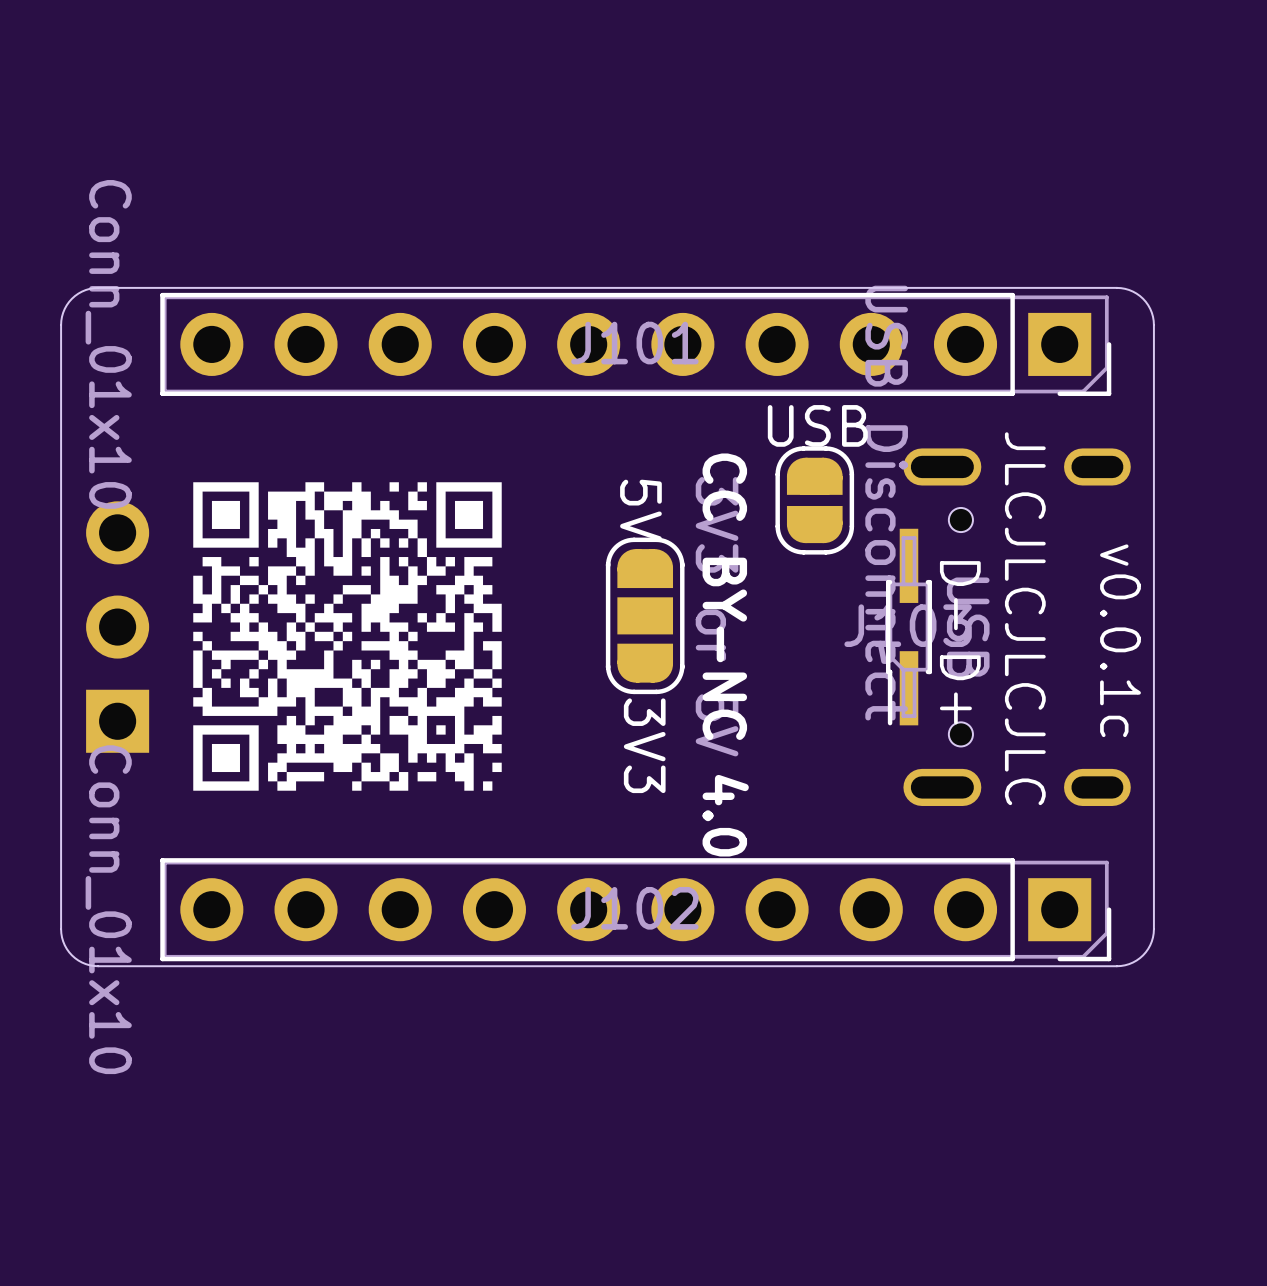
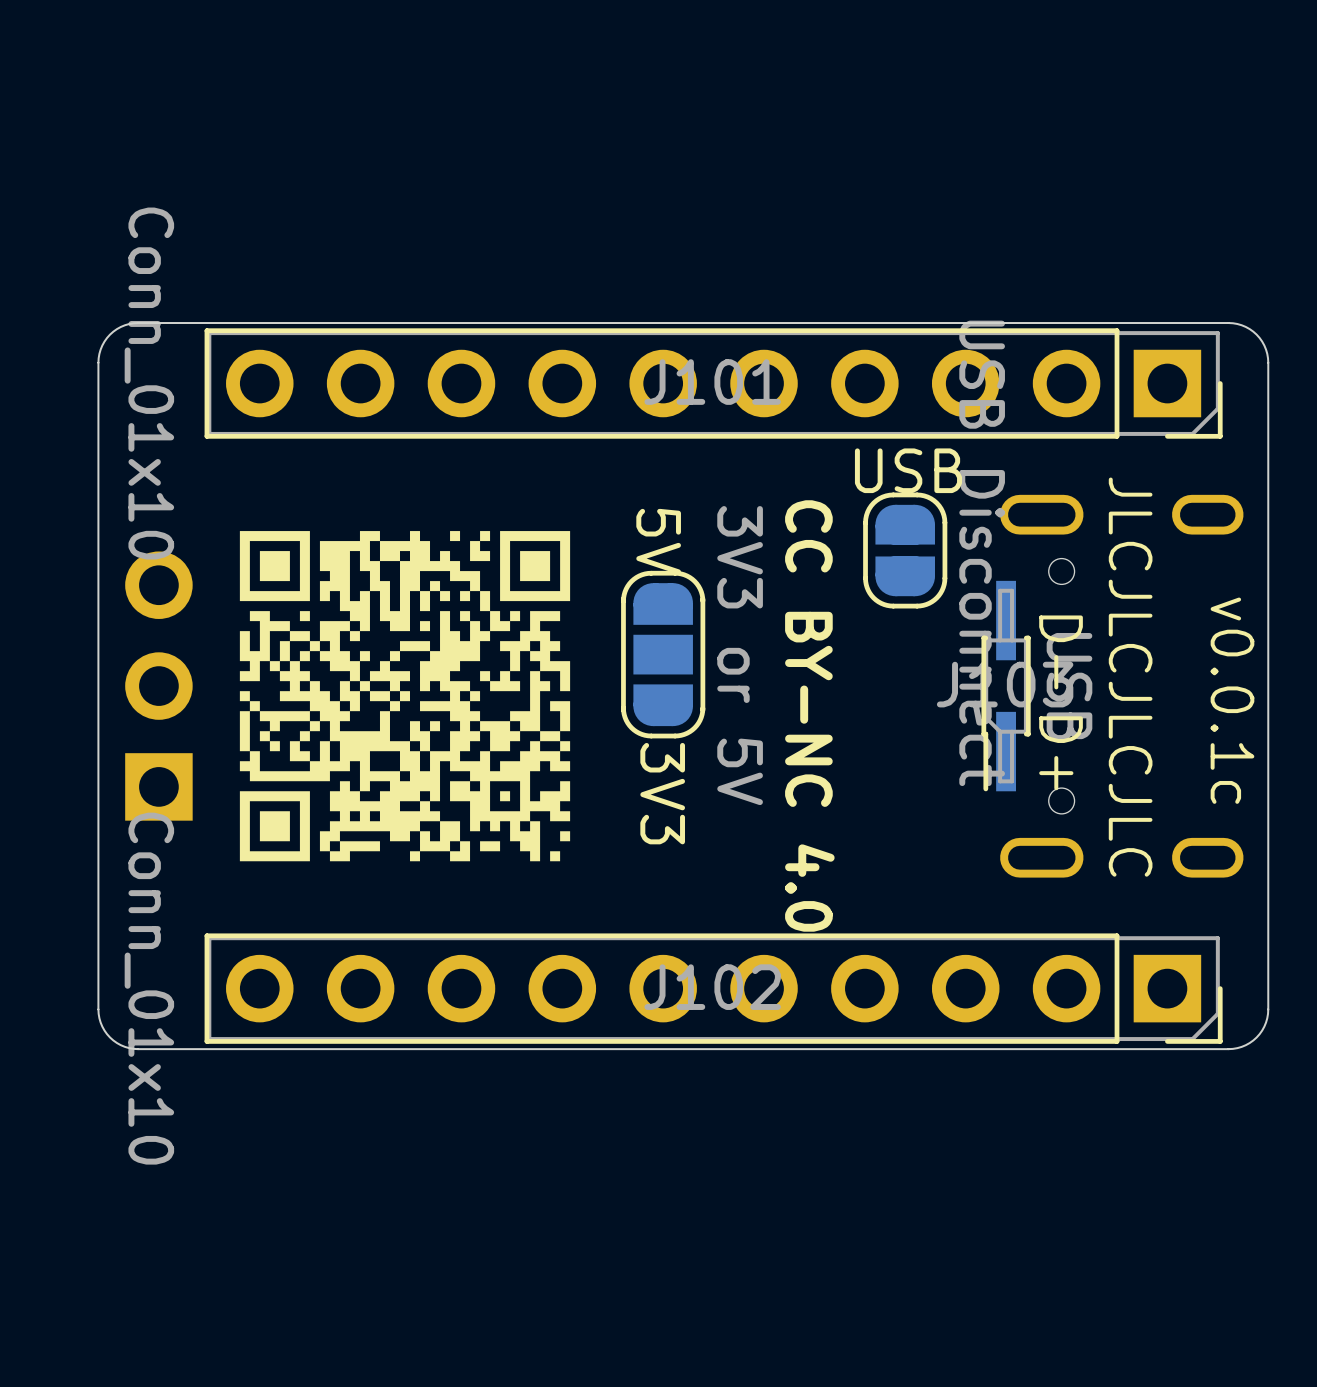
text position: 5V (640, 510) -> 5V (658, 541)
part position: (645, 615) -> (663, 654)
text position: 3V3 (644, 745) -> 3V3 (662, 793)

